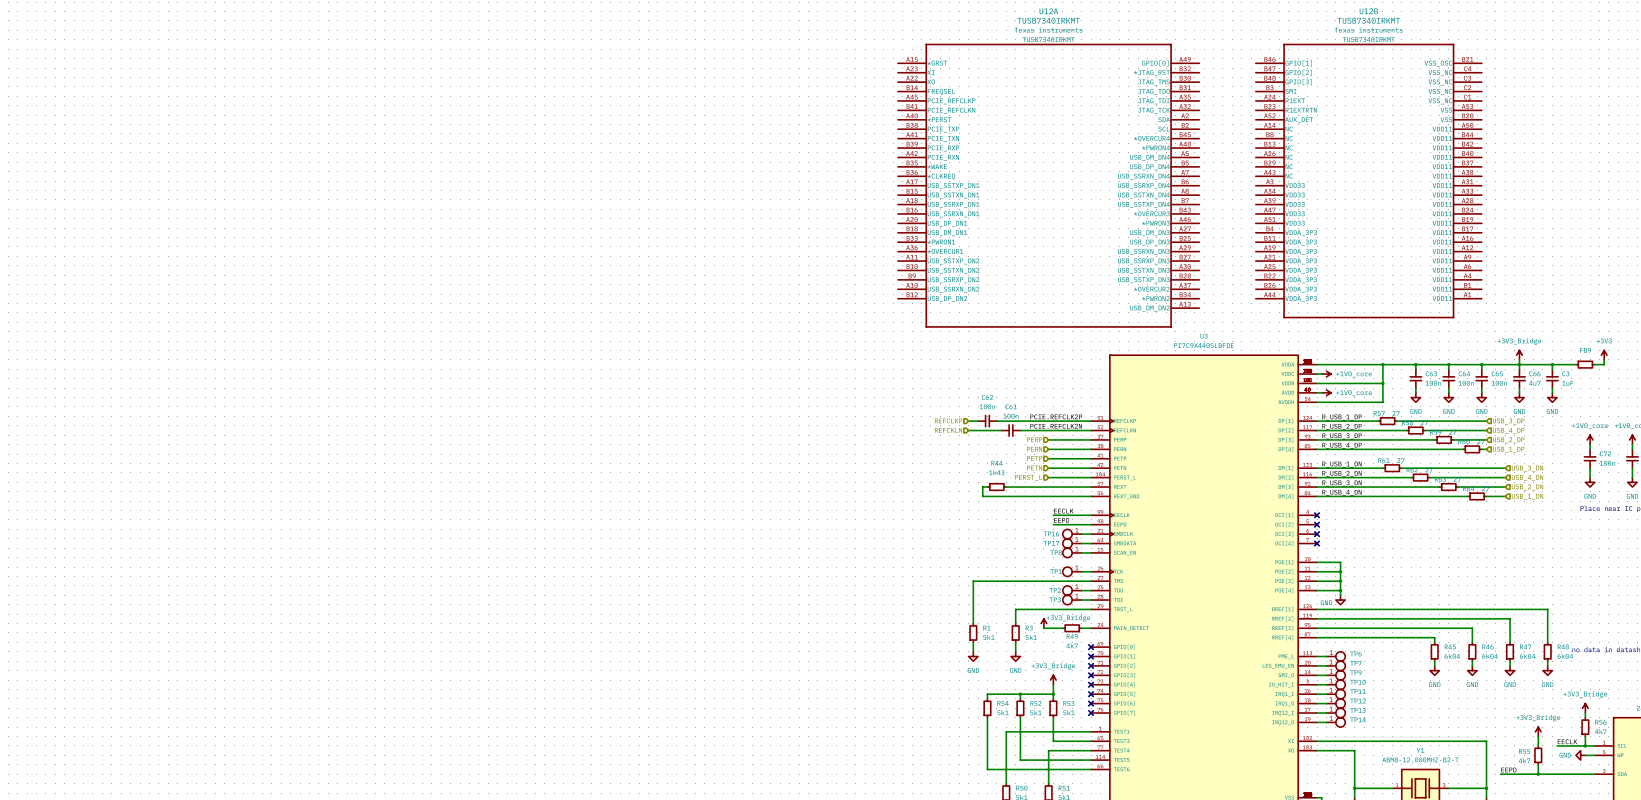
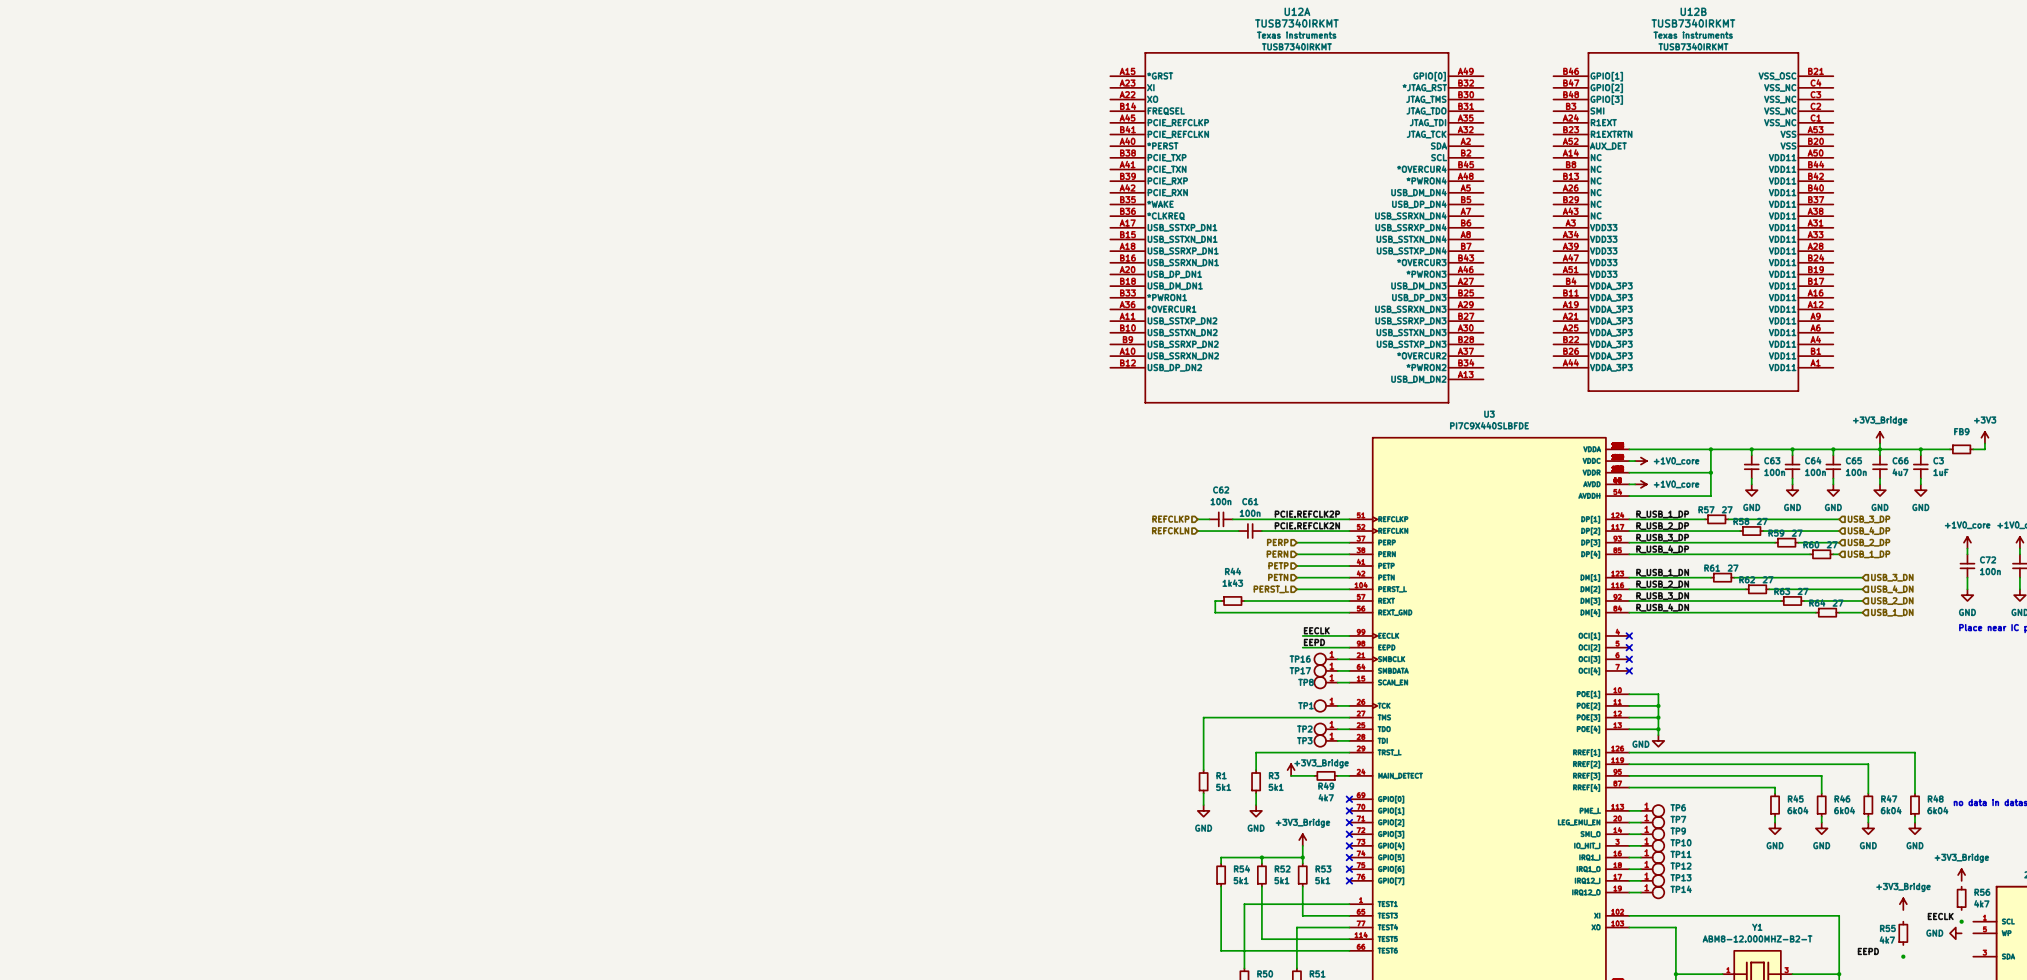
wire: (1585, 713) (1585, 717) -> none
wire: (1538, 736) (1538, 745) -> none
wire: (1585, 736) (1585, 745) -> none
wire: (1557, 745) (1594, 745) -> none
wire: (1585, 755) (1594, 755) -> none
wire: (1538, 764) (1538, 774) -> none
wire: (1500, 774) (1594, 774) -> none

